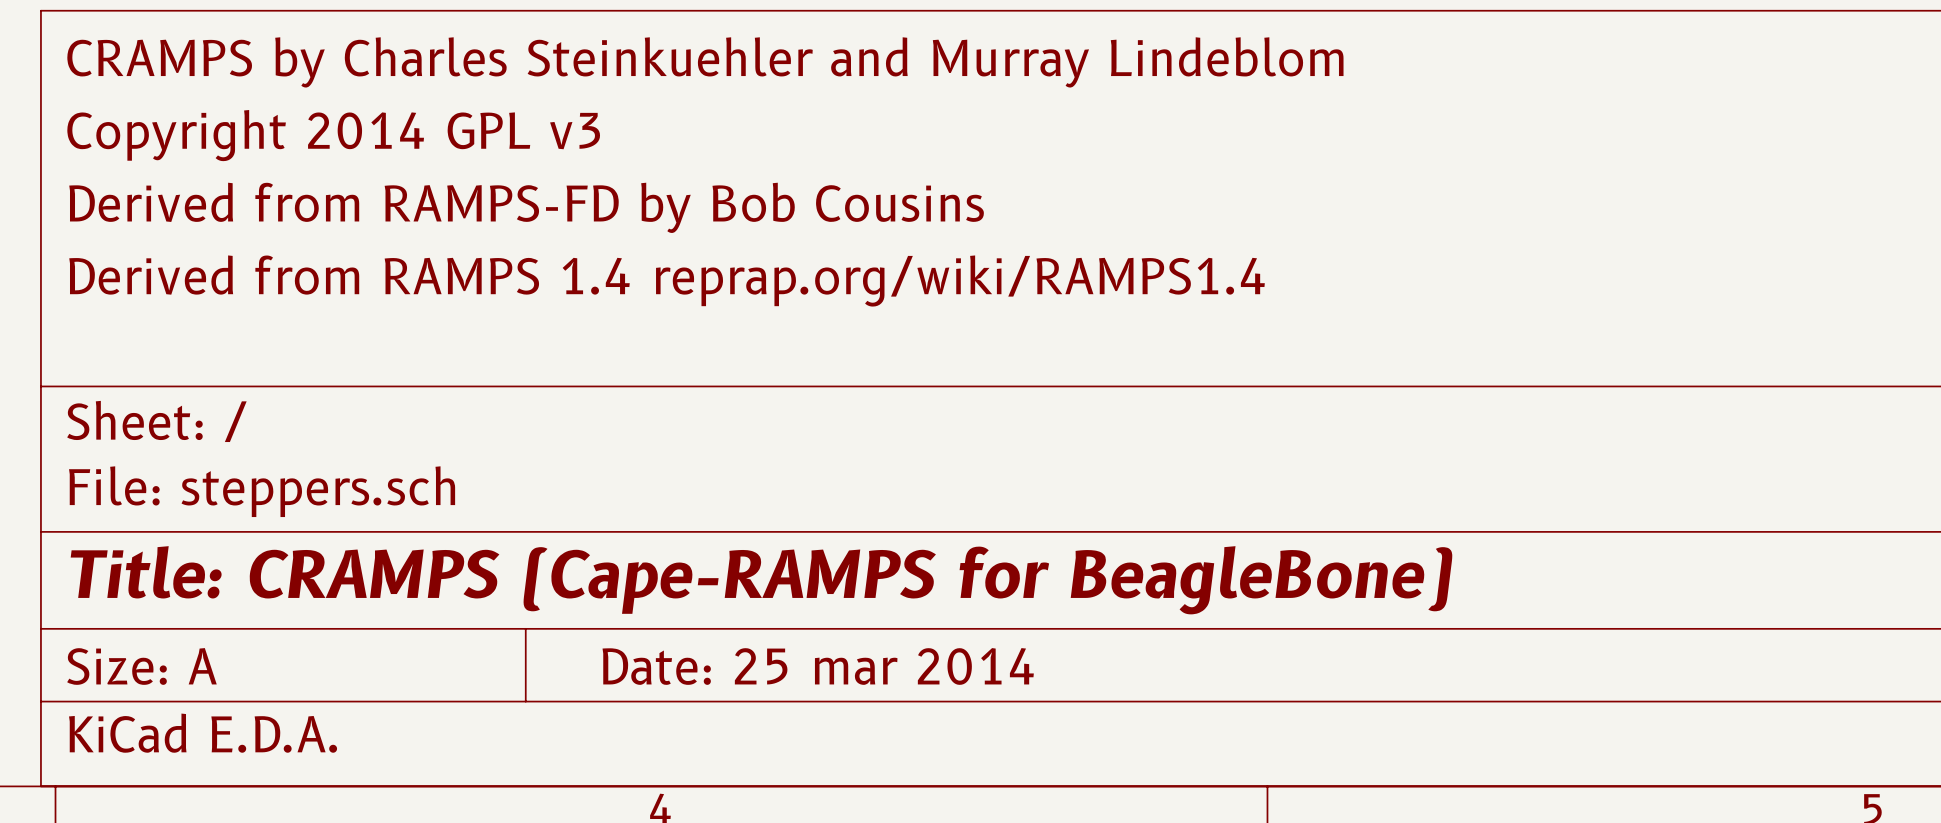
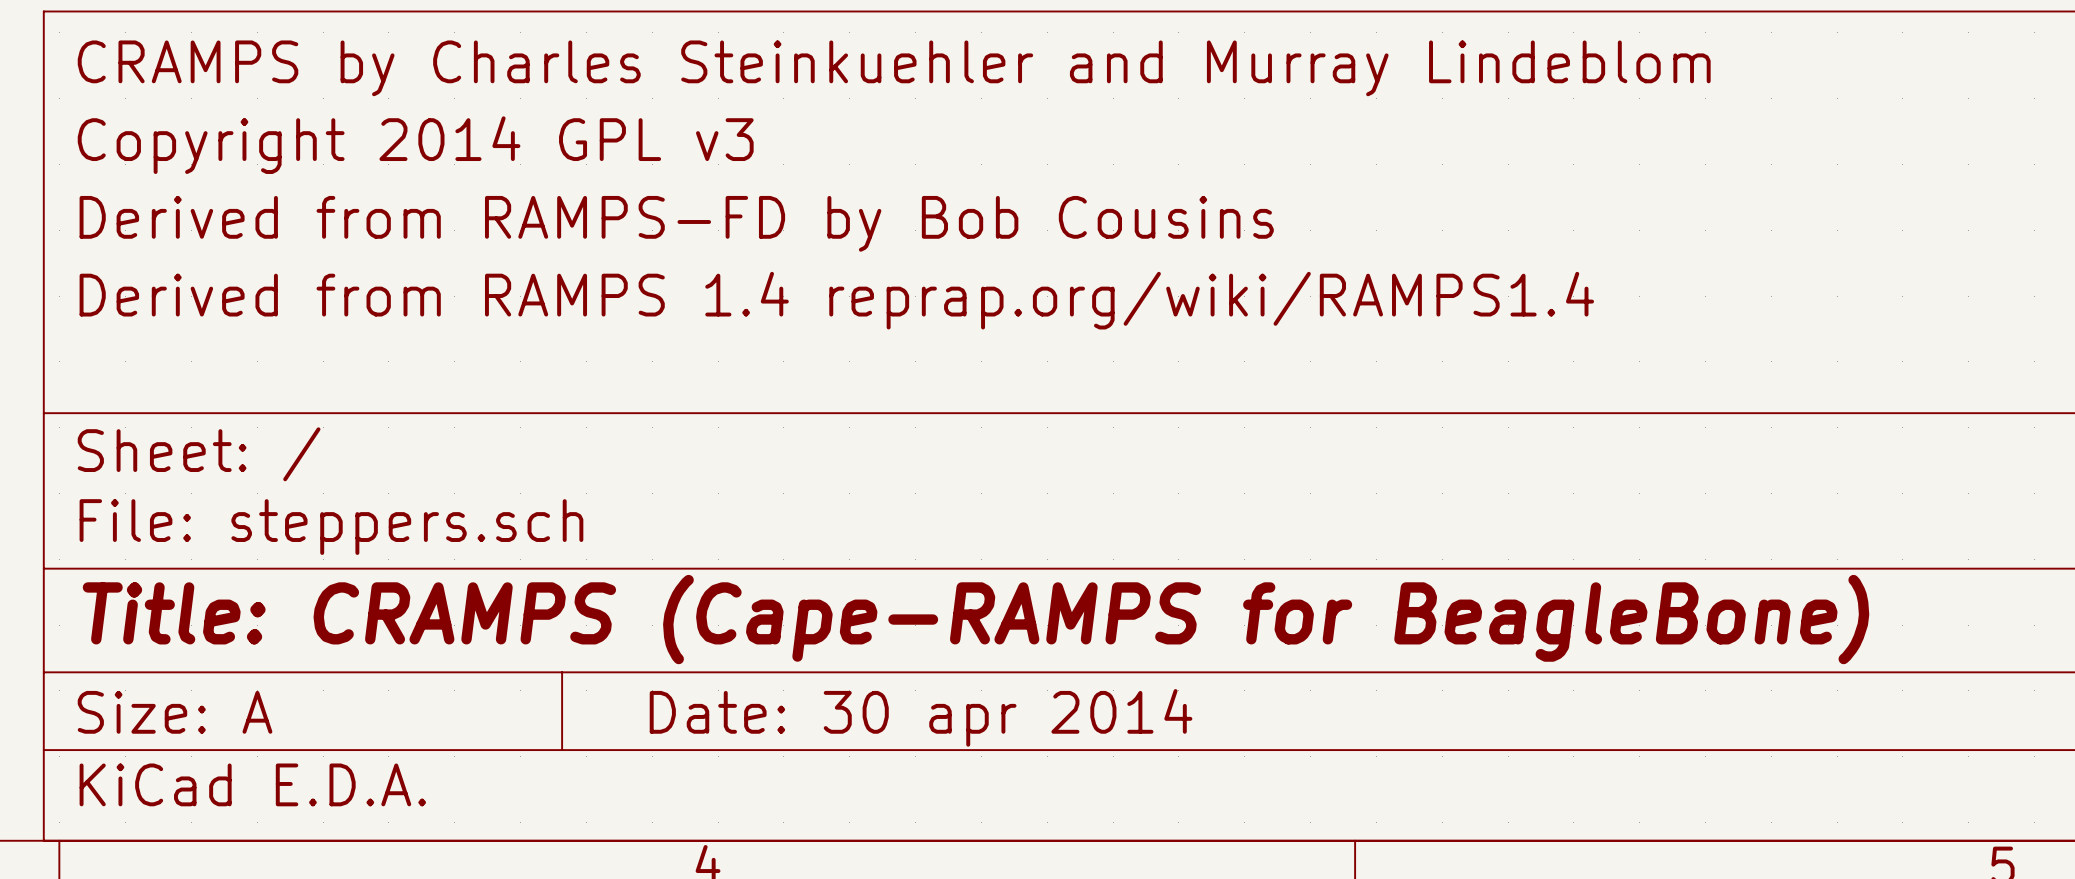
title block: Date: 25 mar 2014 (818, 666) -> Date: 30 apr 2014 (921, 717)

